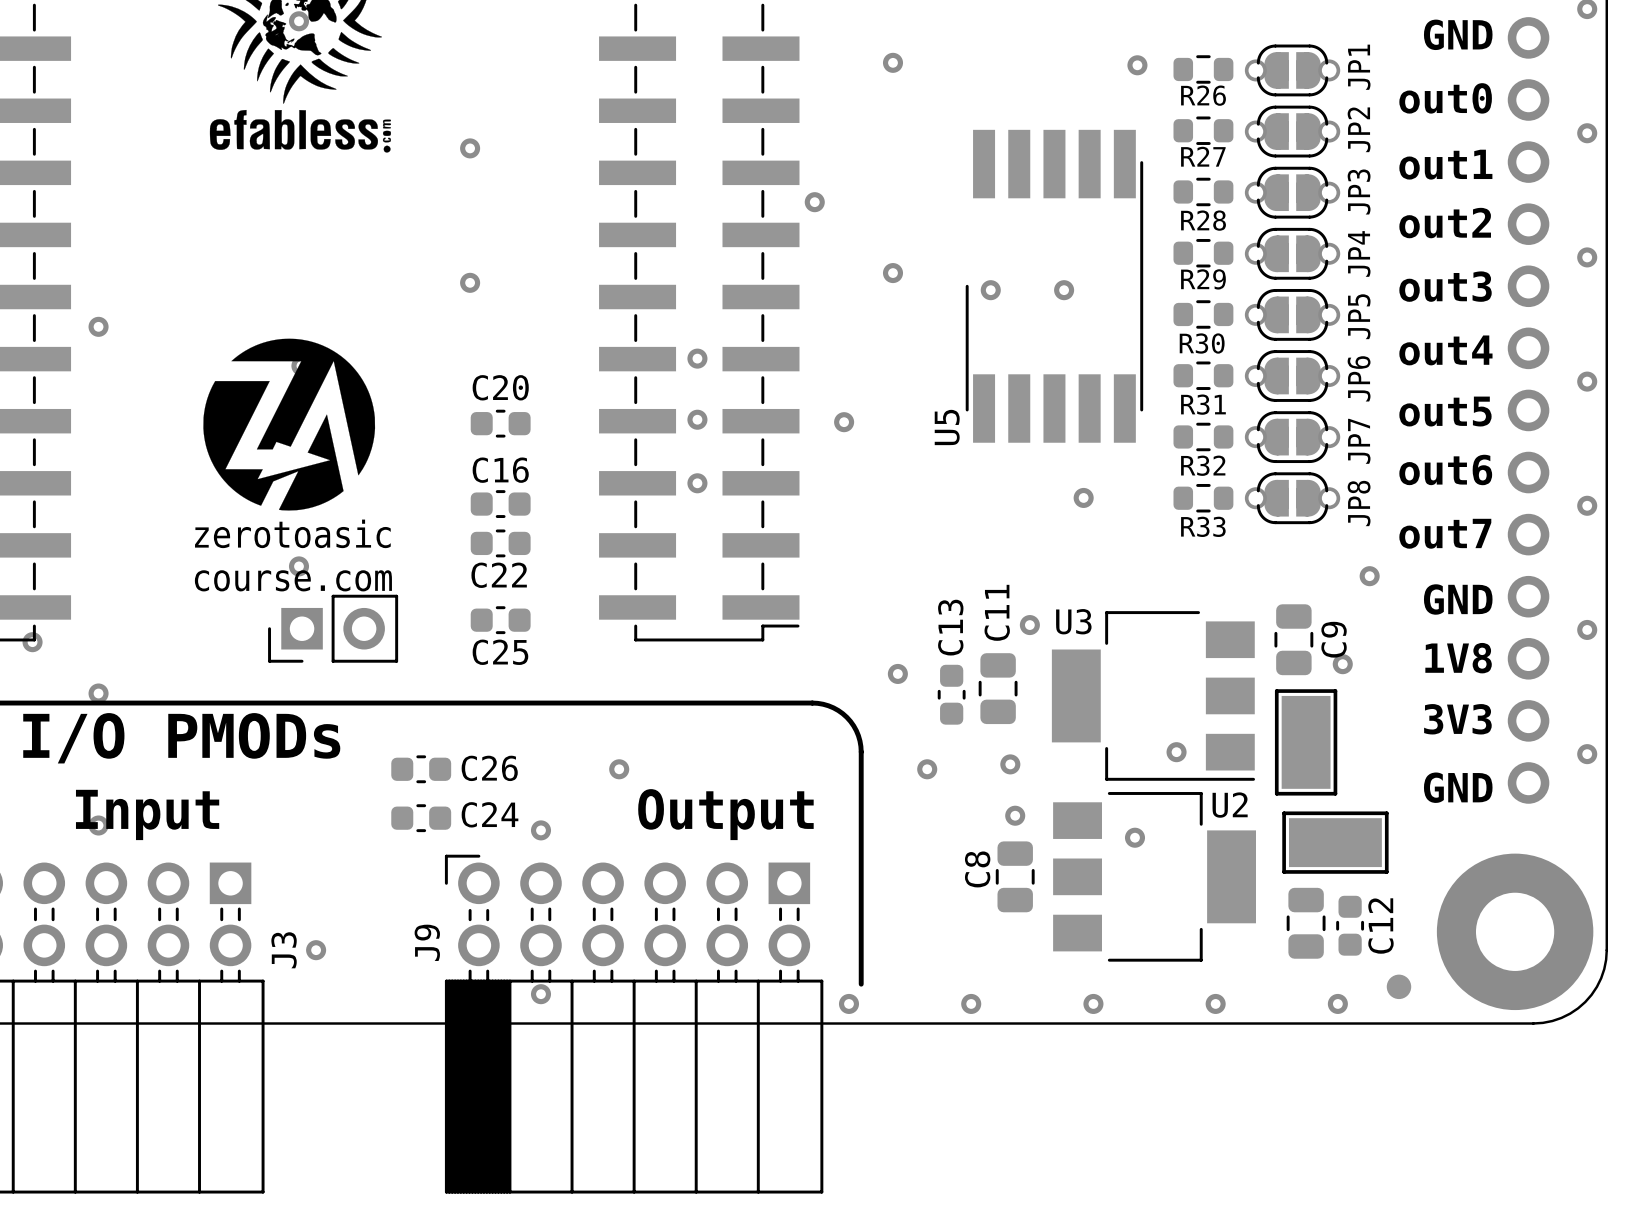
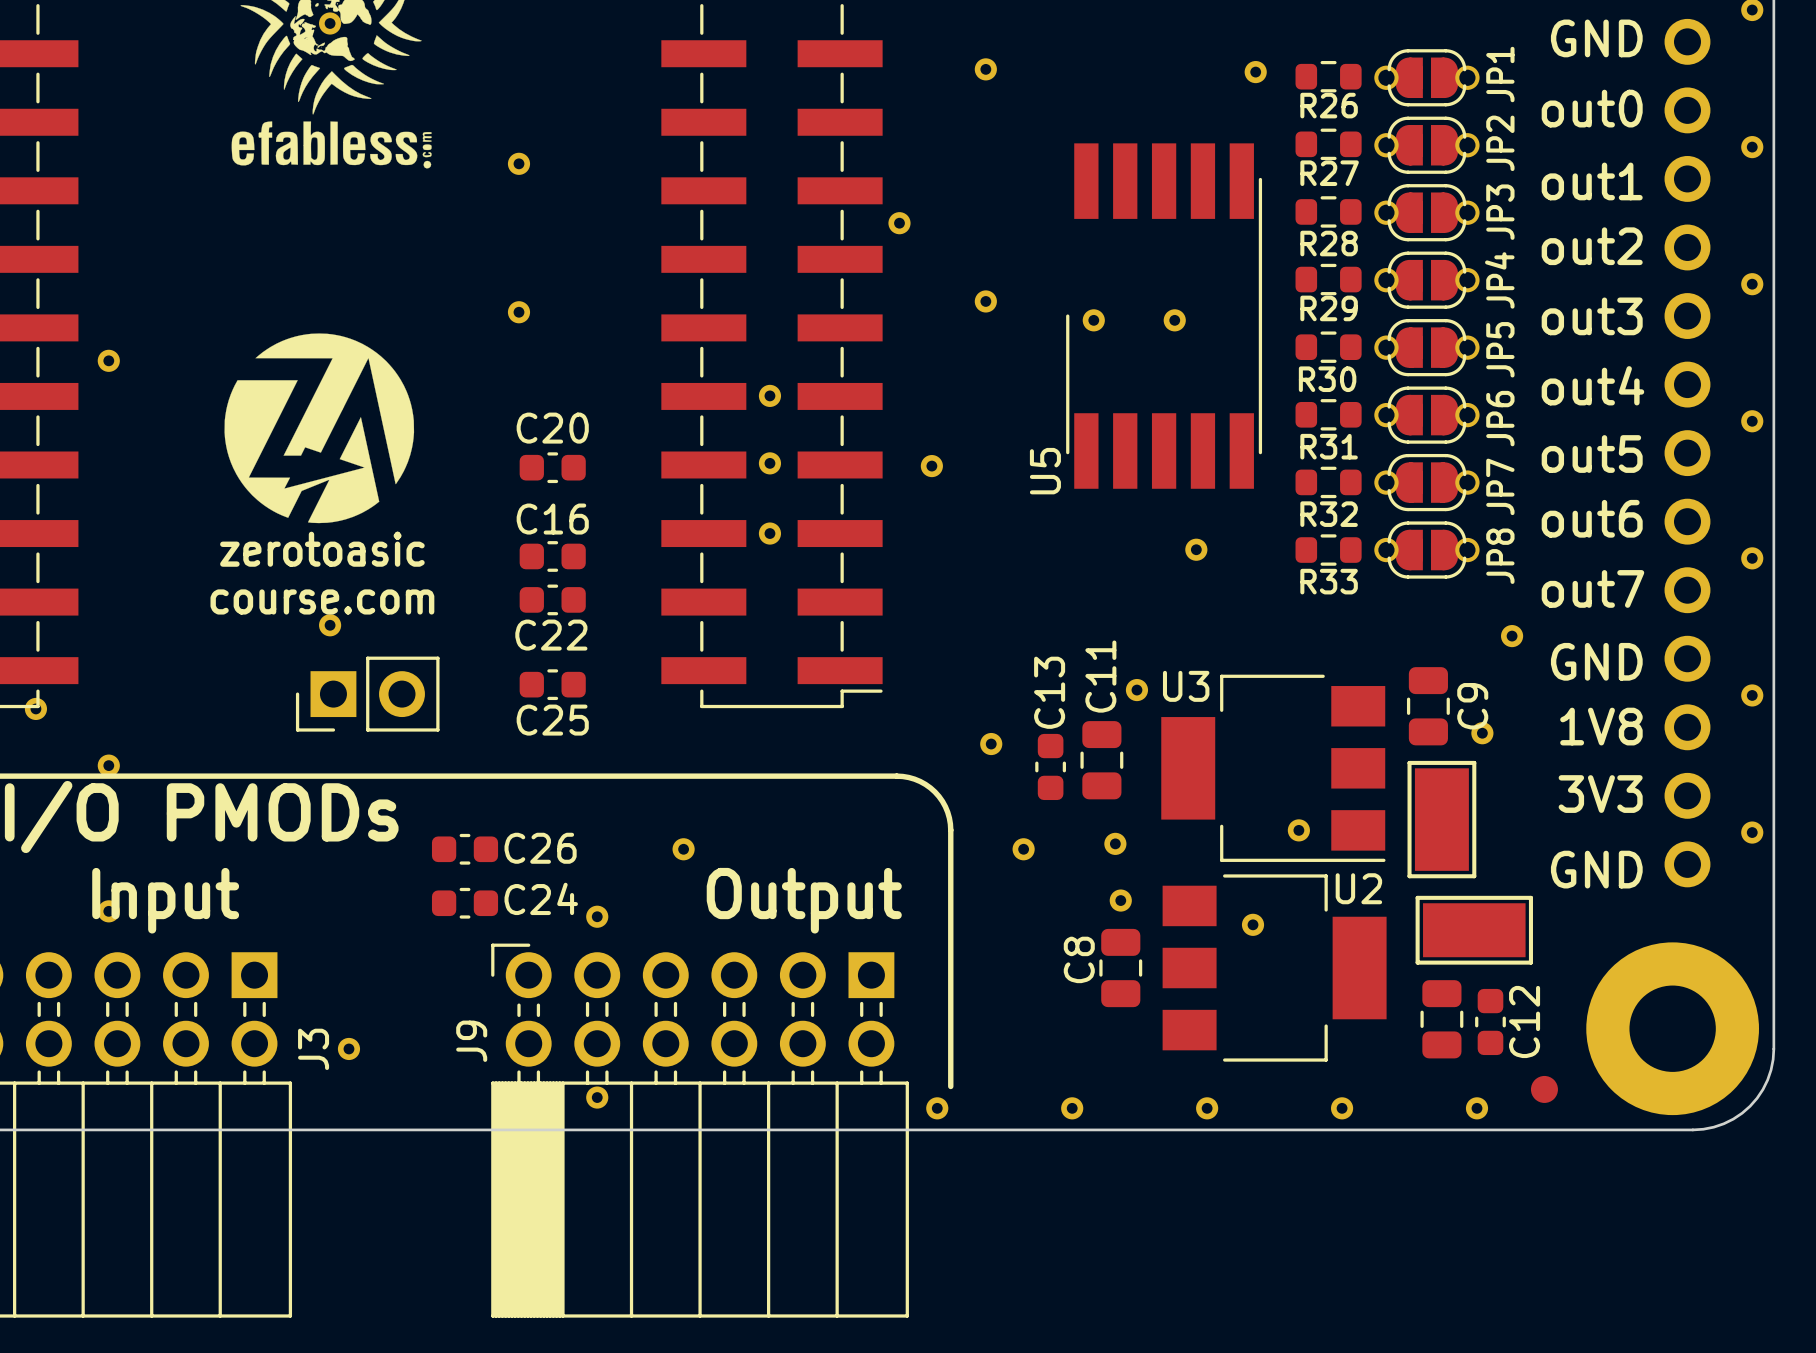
drawing position: (289, 424) -> (319, 428)
text position: zerotoasic (292, 533) -> zerotoasic (322, 549)
text position: course.com (293, 580) -> course.com (322, 601)

